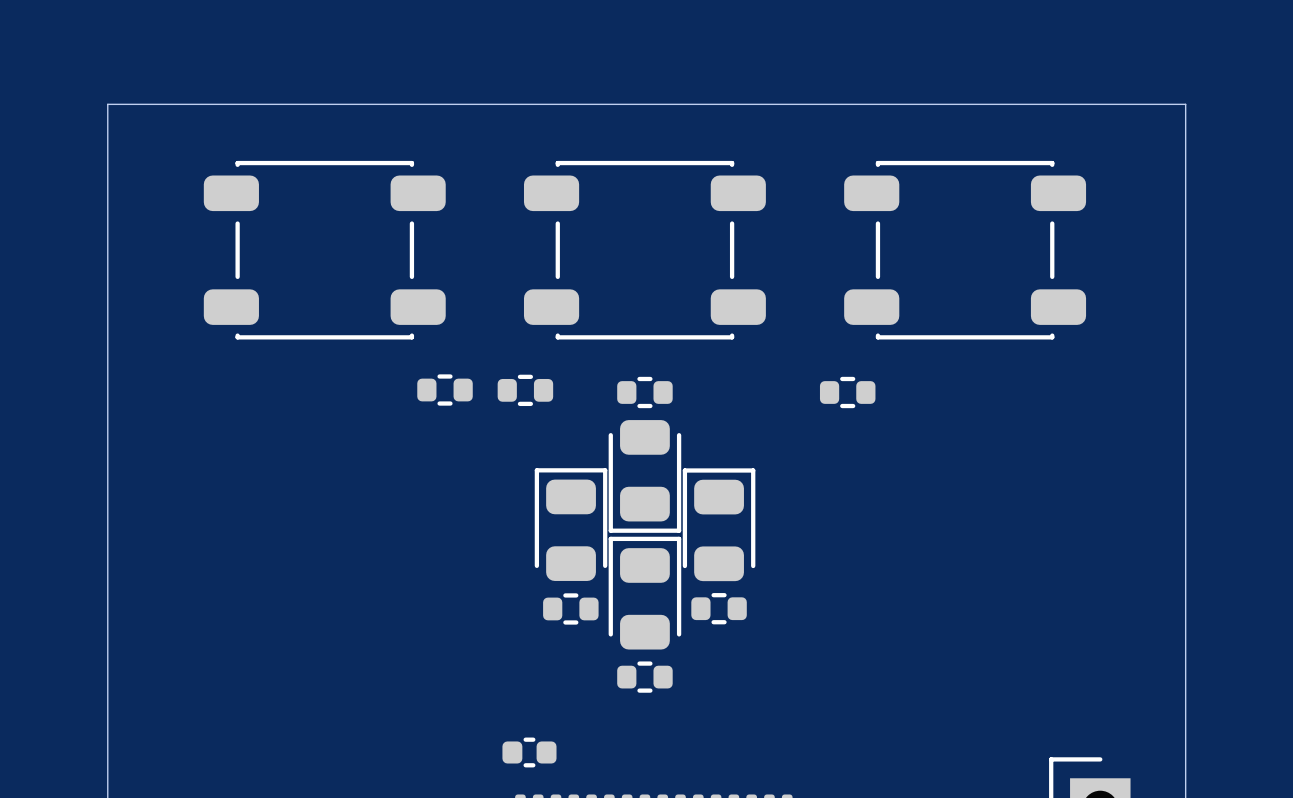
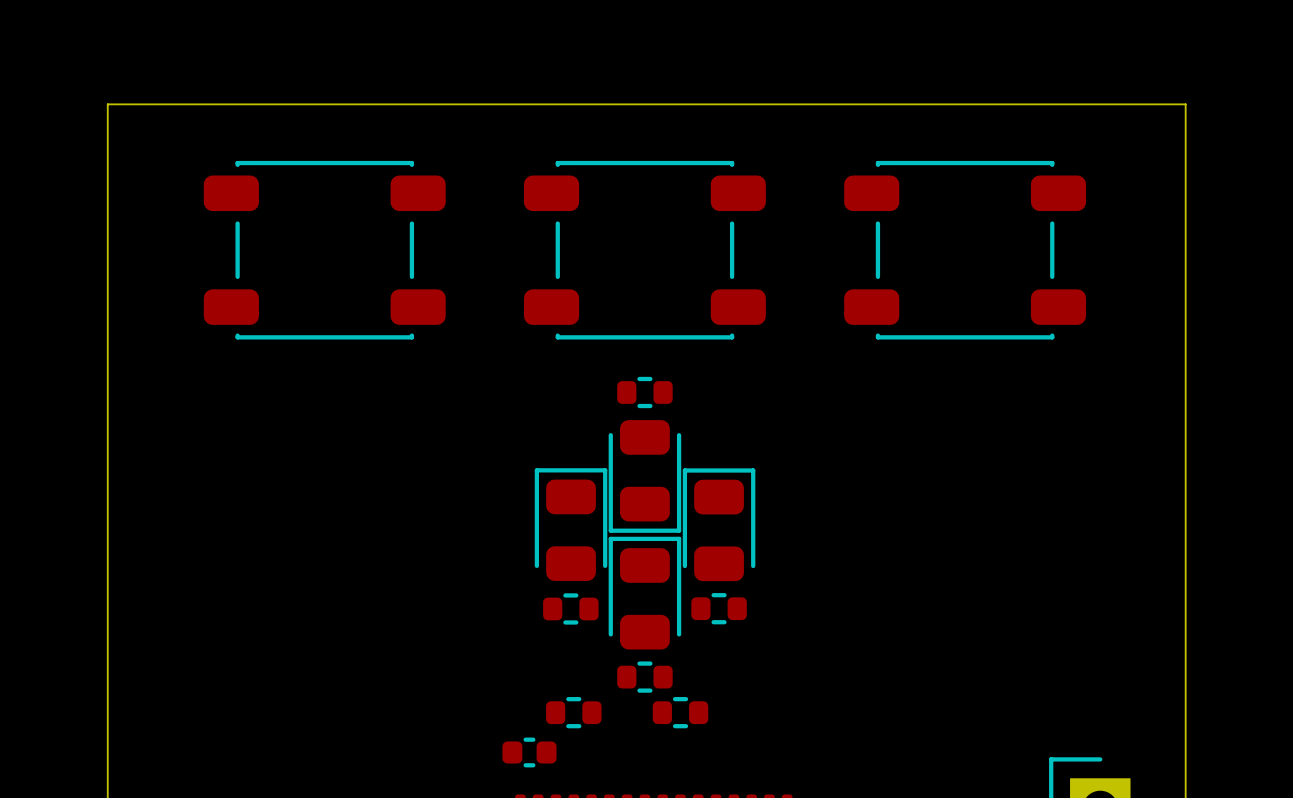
part: (445, 390) -> none
part: (525, 390) -> none
part: (847, 392) -> none
part: none -> (573, 712)
part: none -> (680, 712)

